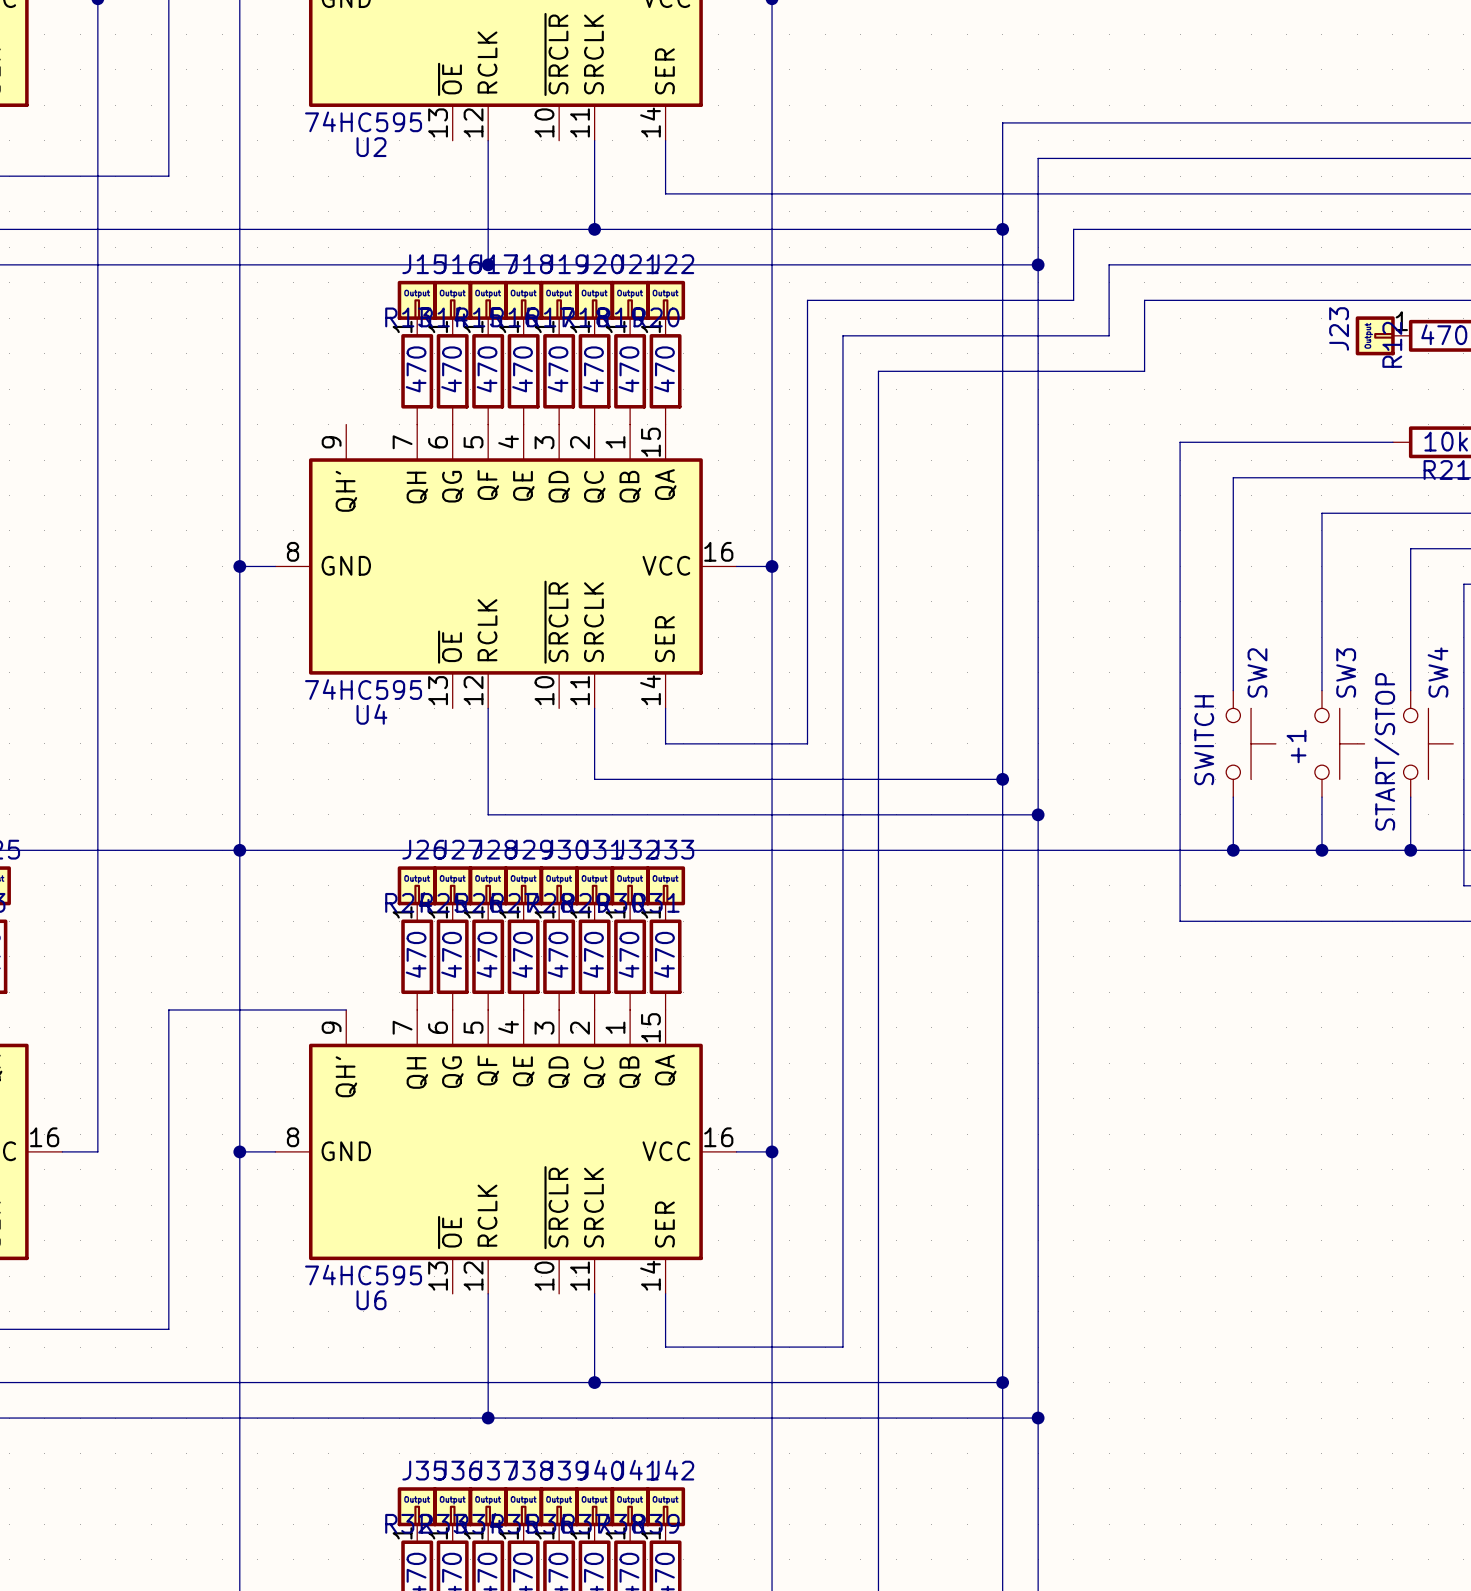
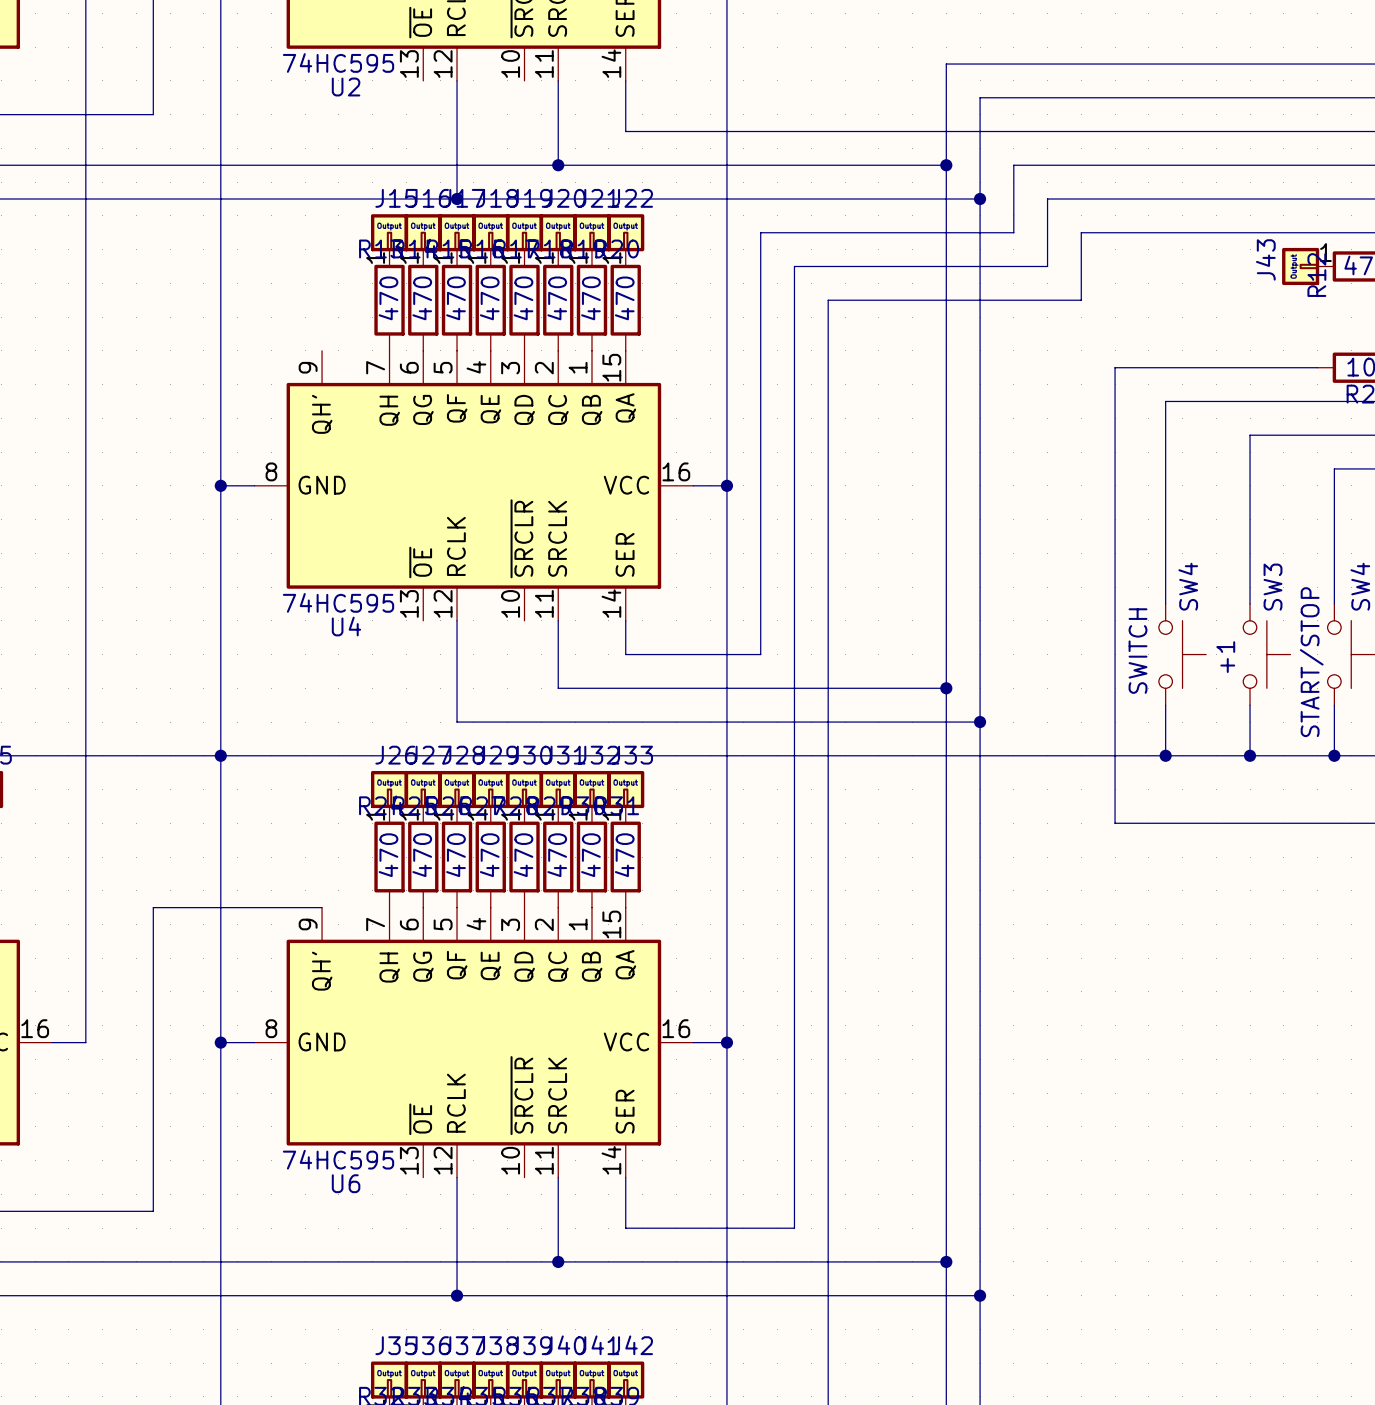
J23 name: J23 (1339, 328) -> J43 (1265, 259)
SW2 name: SW2 (1257, 672) -> SW4 (1188, 586)

